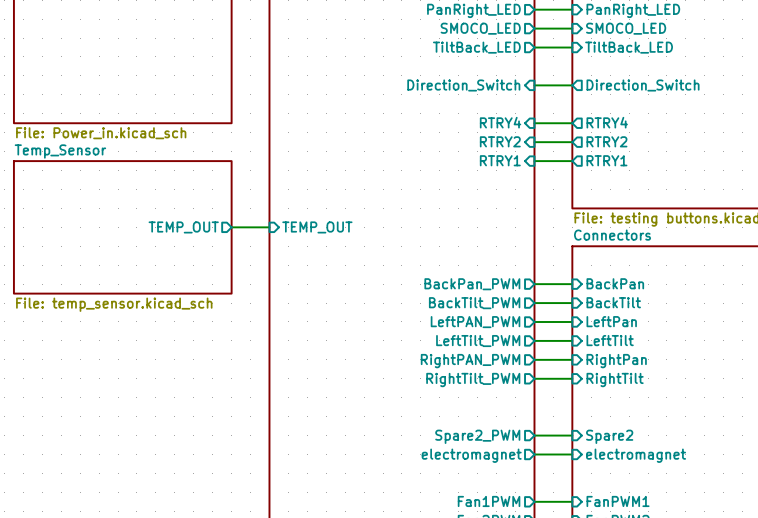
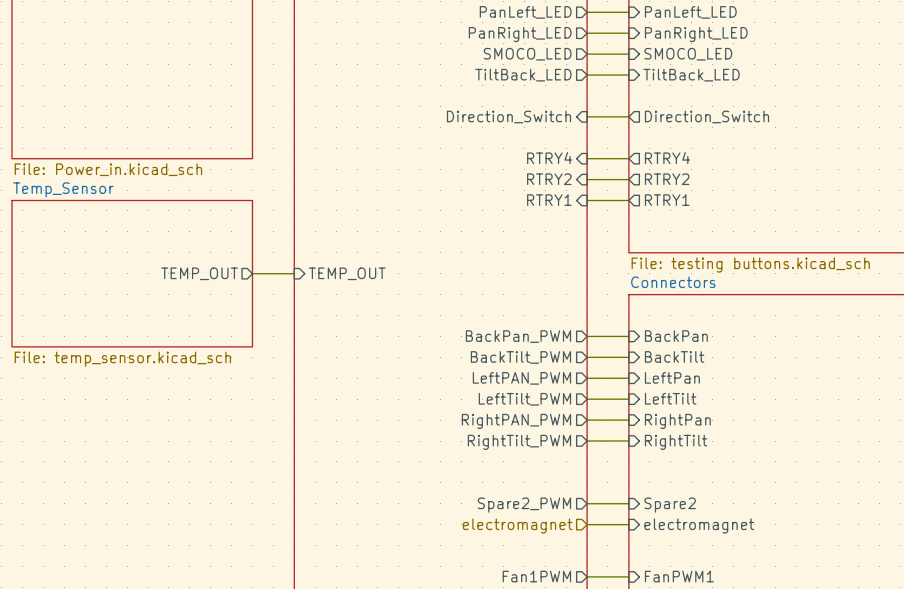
sheet pin: electromagnet (471, 455) -> none
hierarchical label: none -> electromagnet (517, 526)

